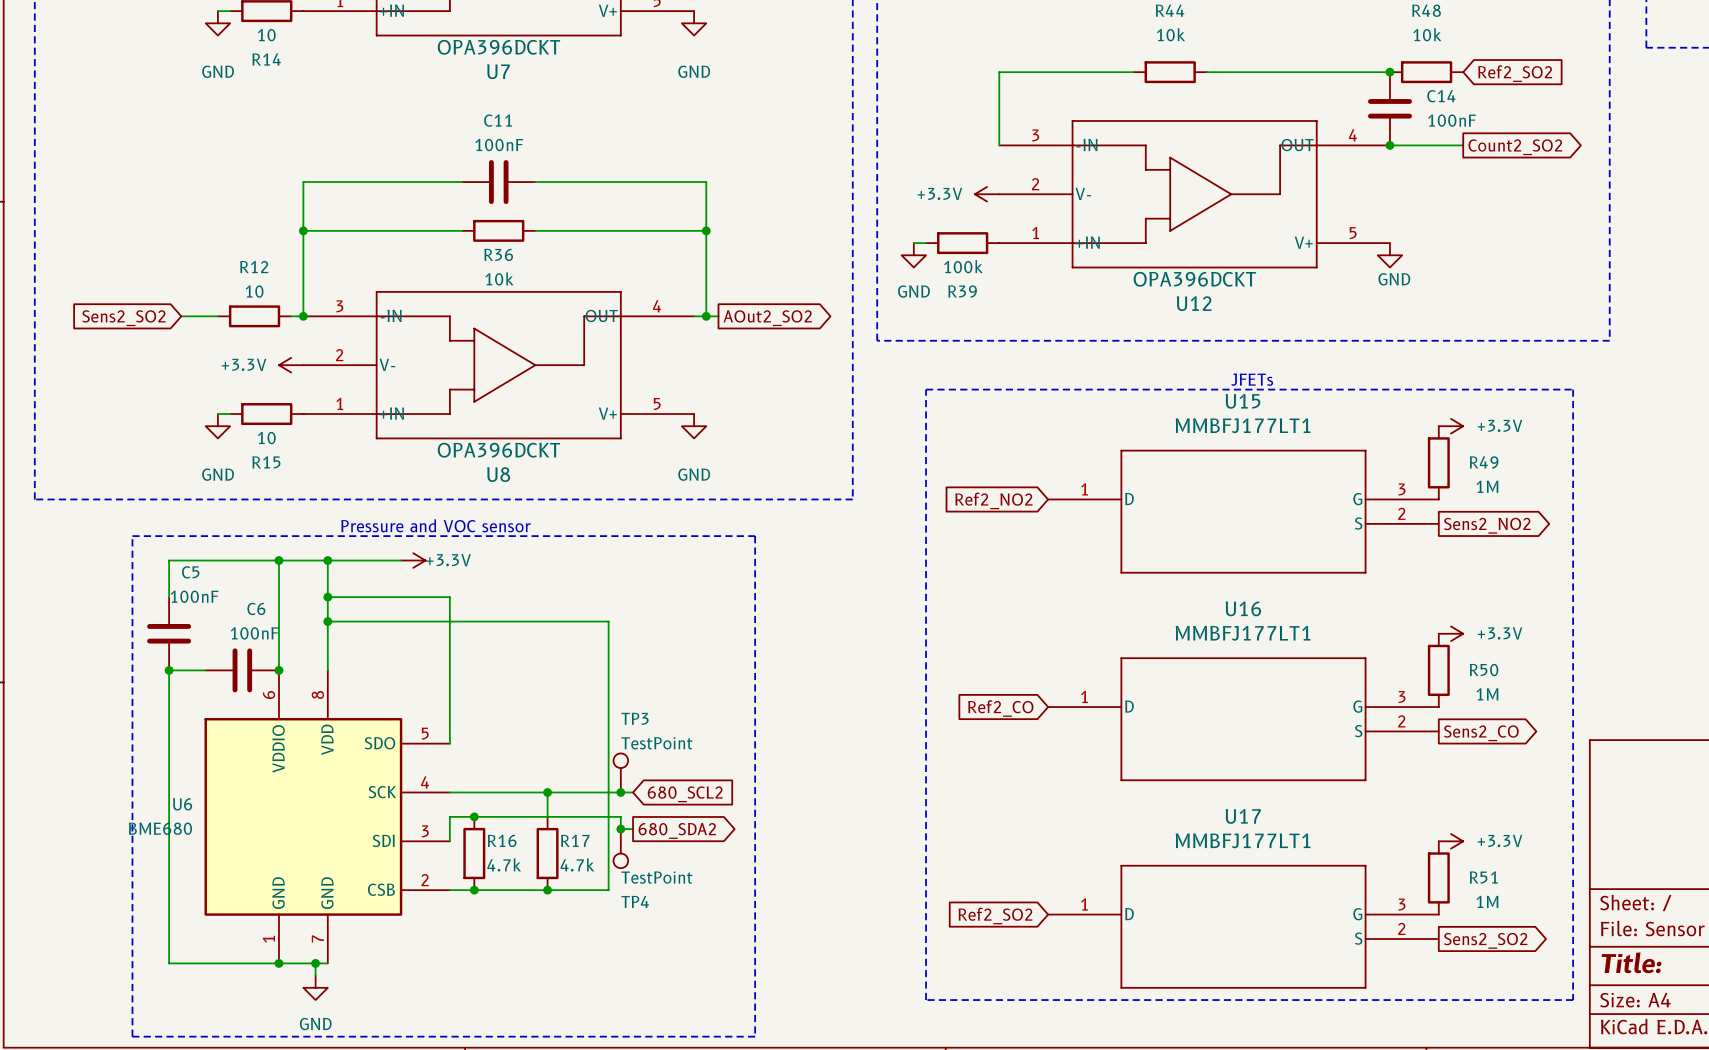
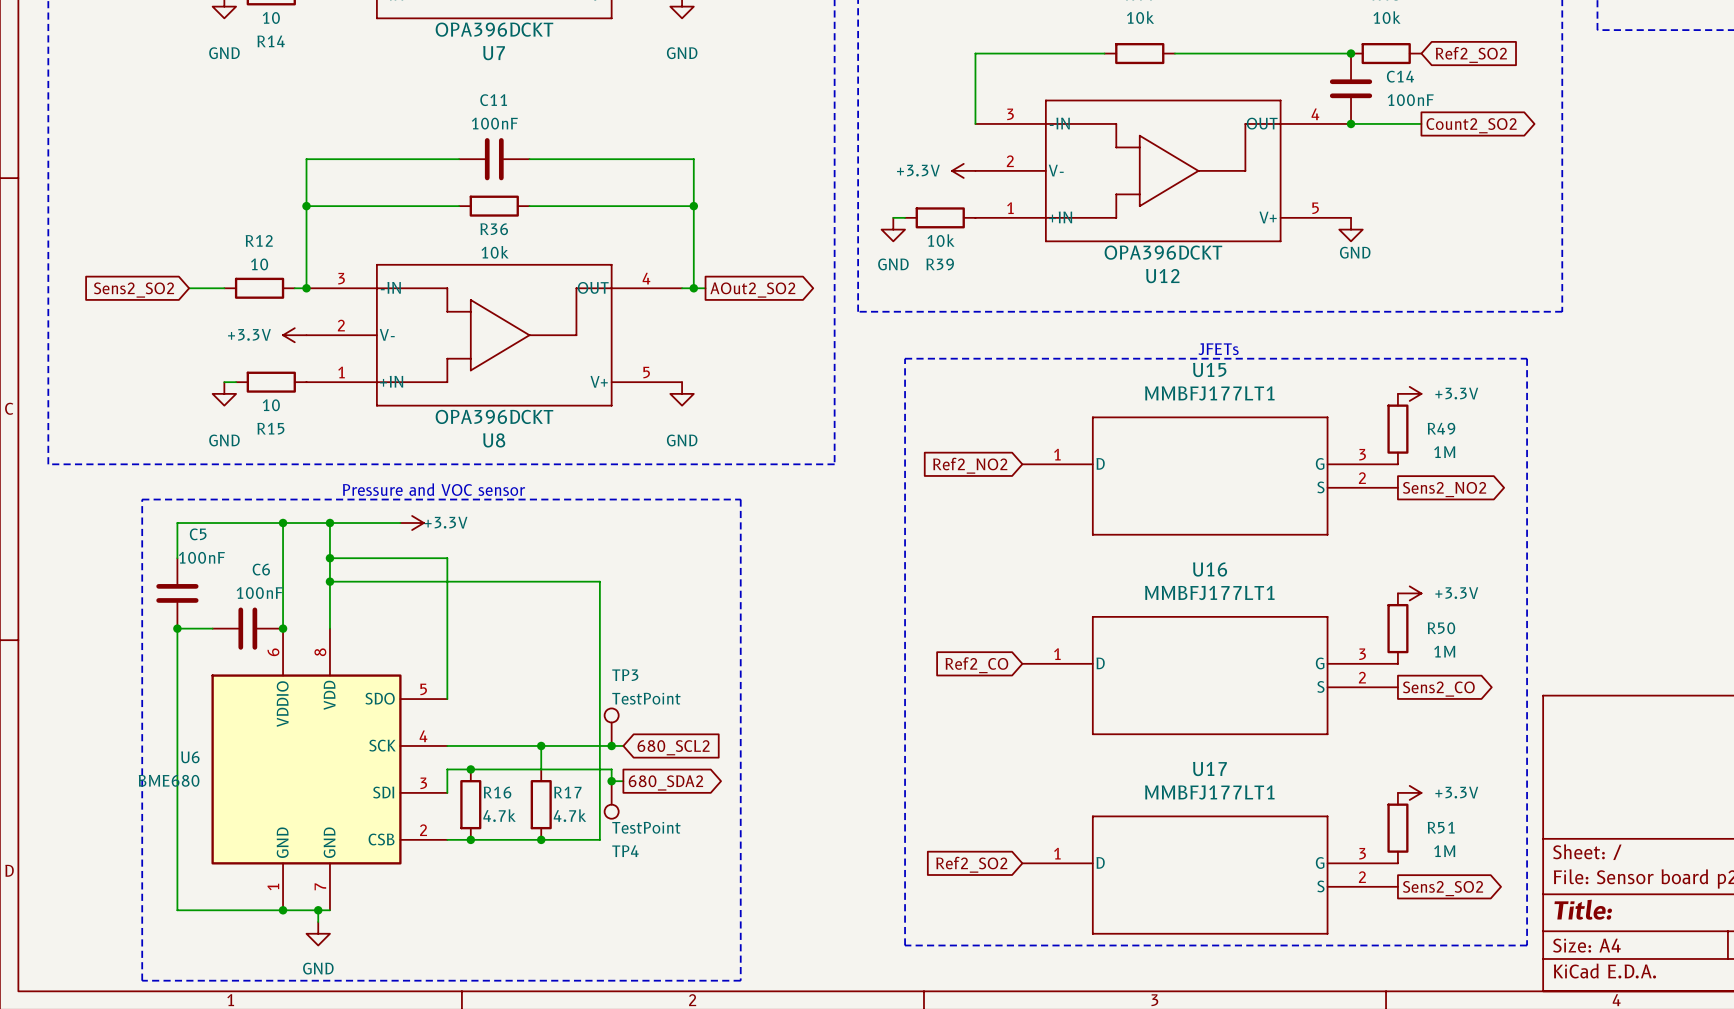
R39 value: 100k (963, 266) -> 10k (941, 240)

